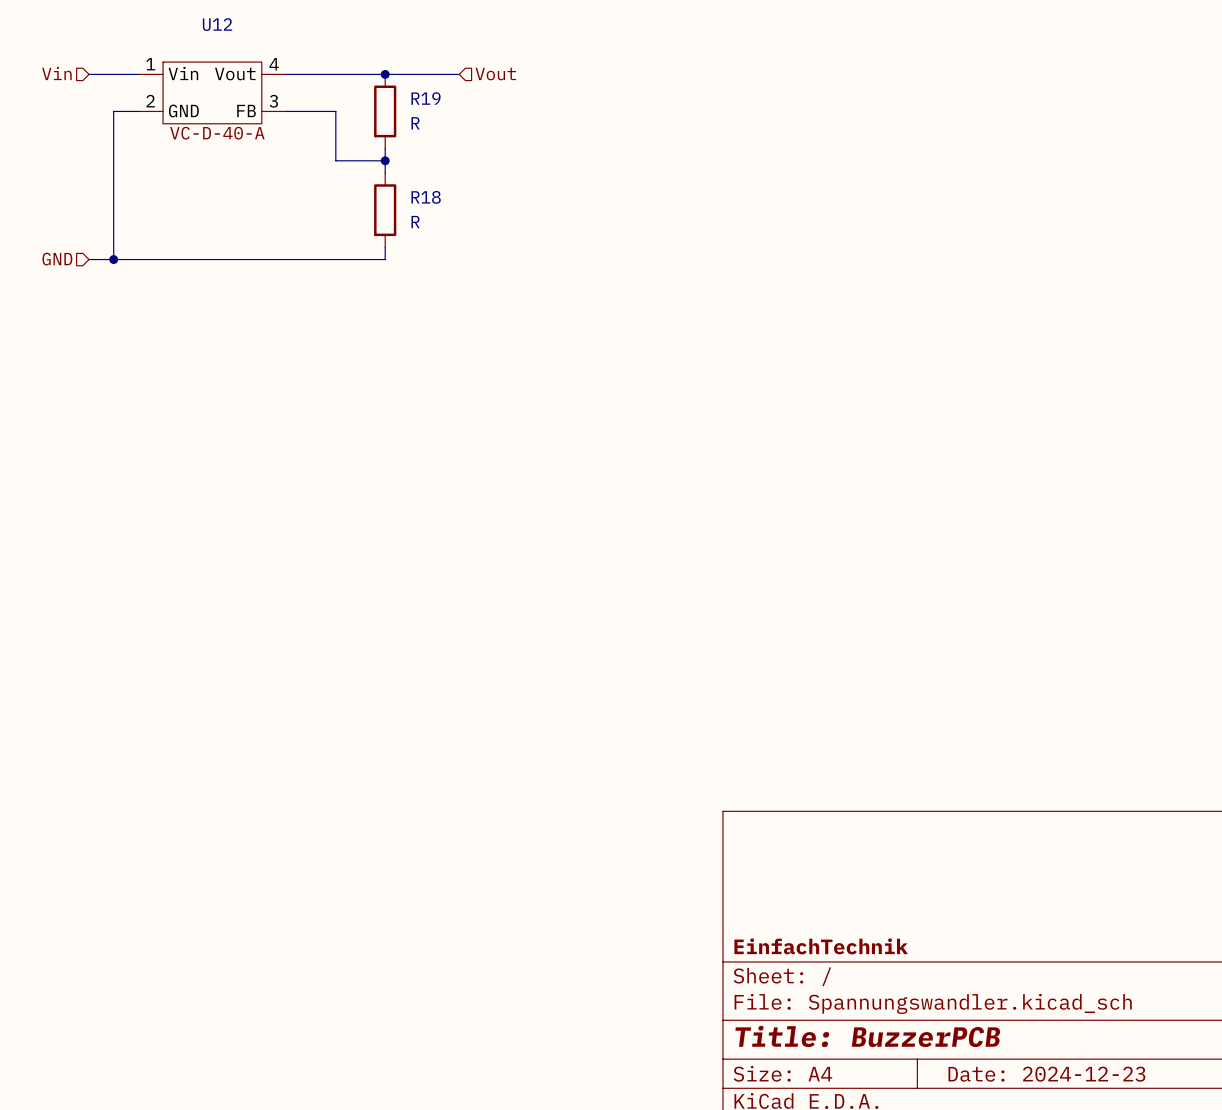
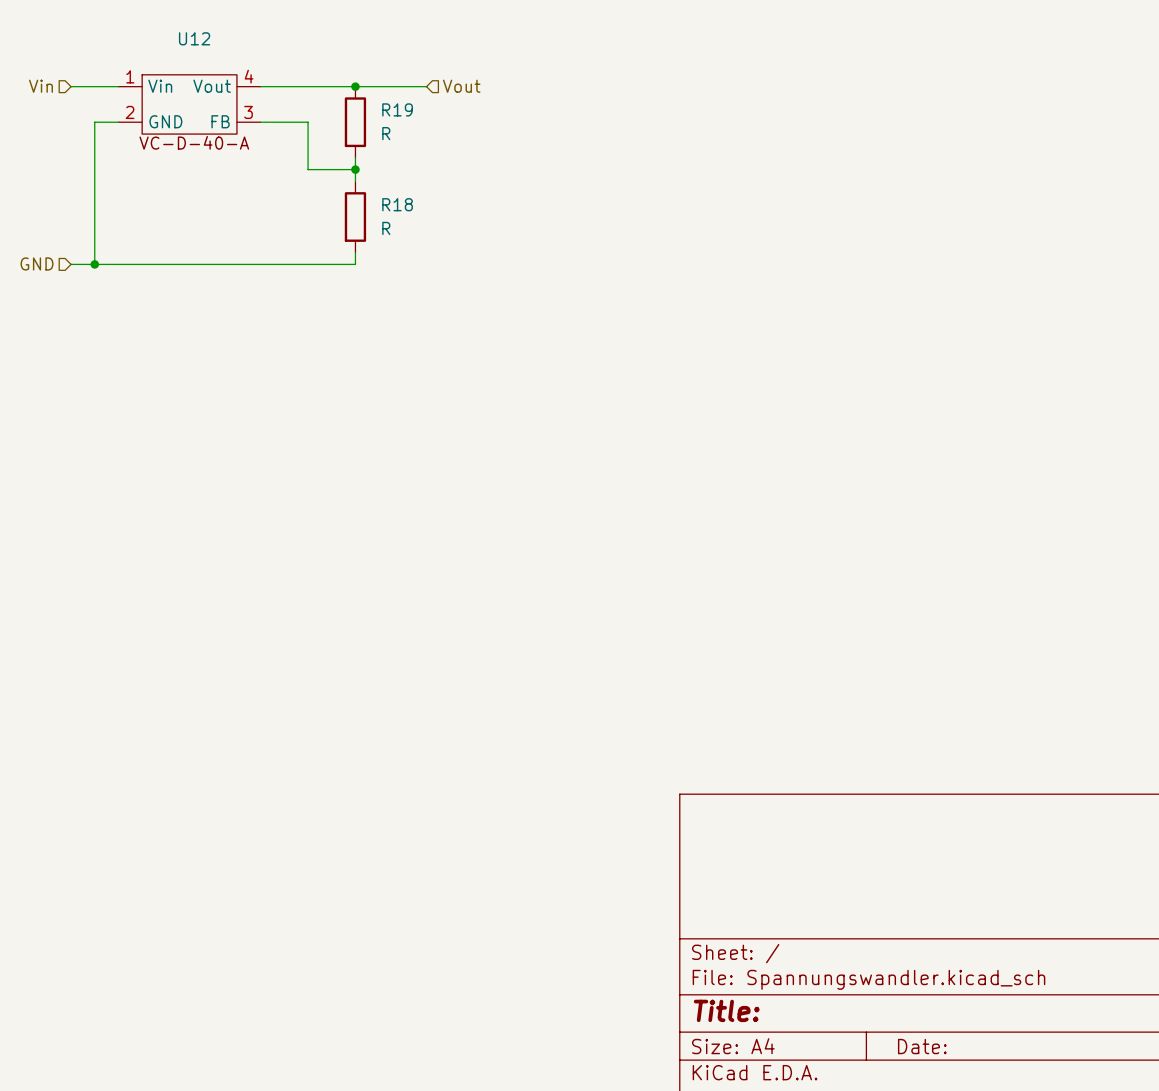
title block: EinfachTechnik (821, 946) -> none
title block: Title: BuzzerPCB (867, 1036) -> Title: (726, 1010)
title block: Date: 2024-12-23 (1046, 1074) -> Date: (922, 1046)

